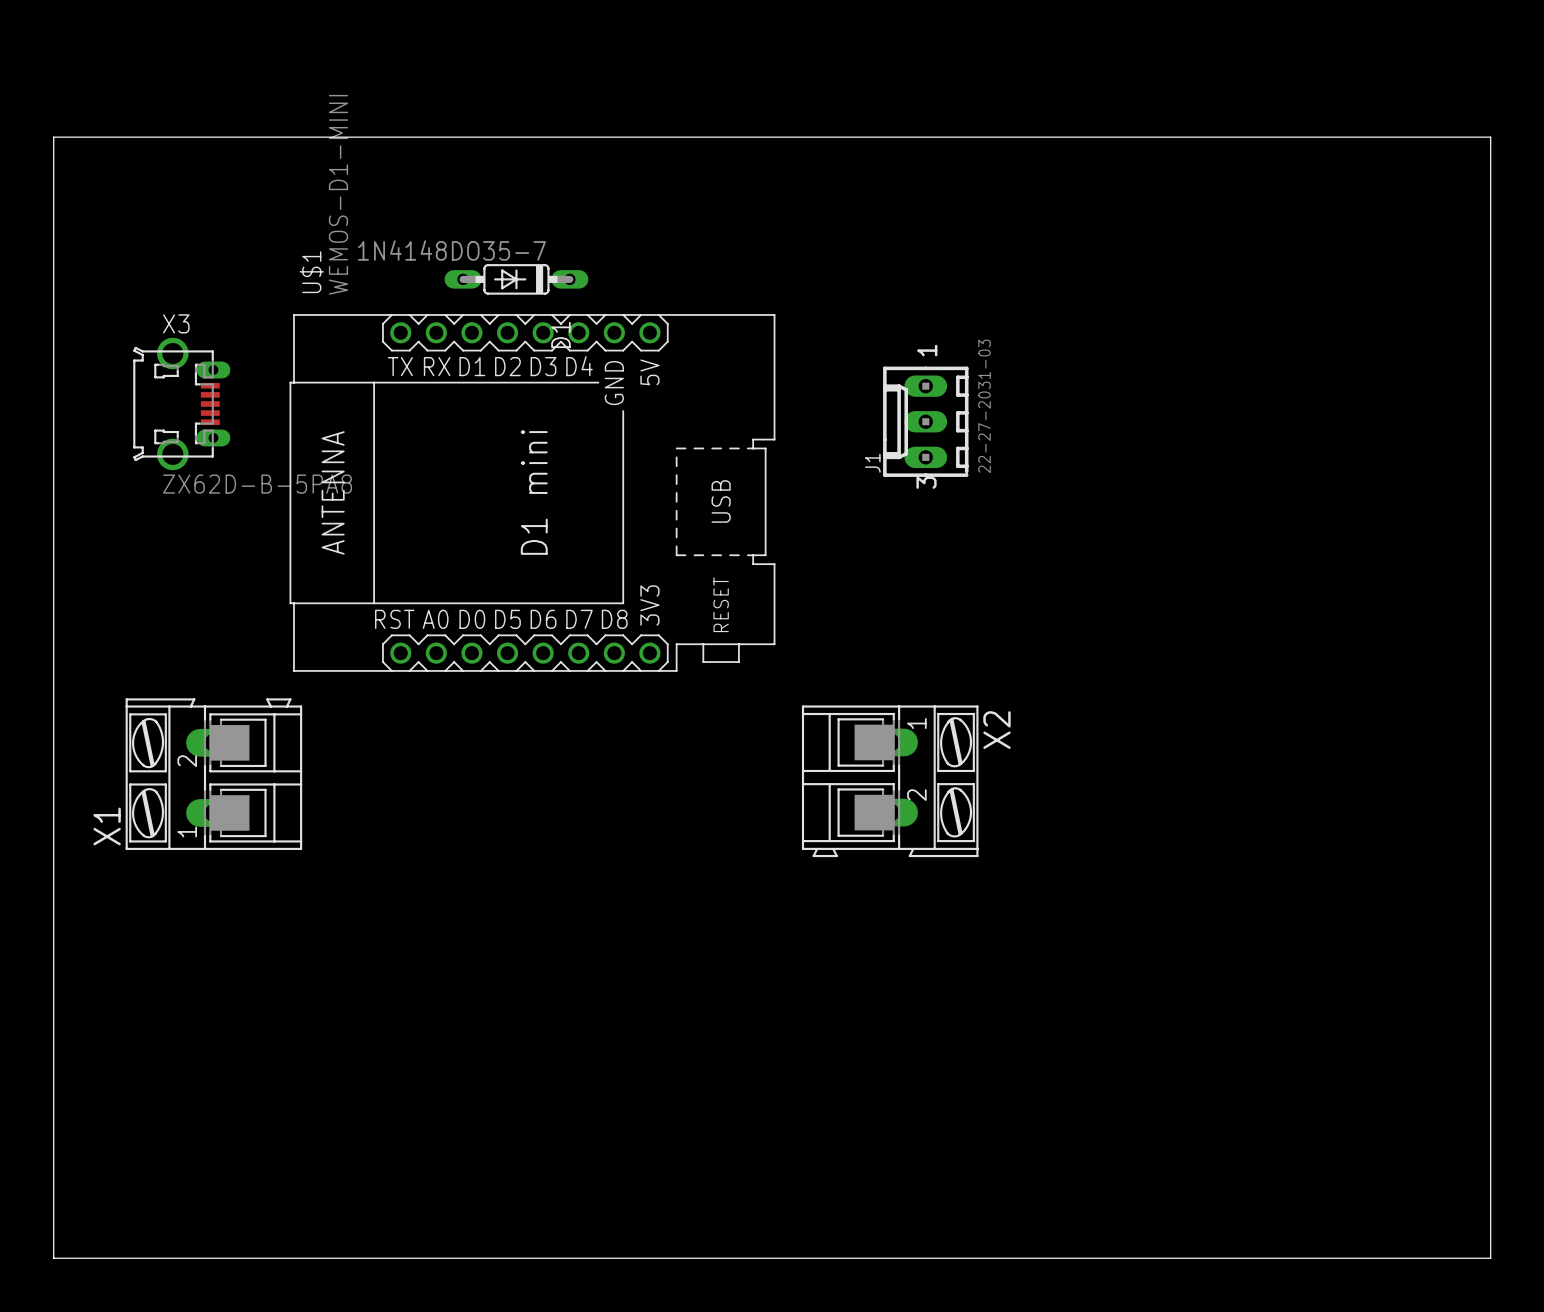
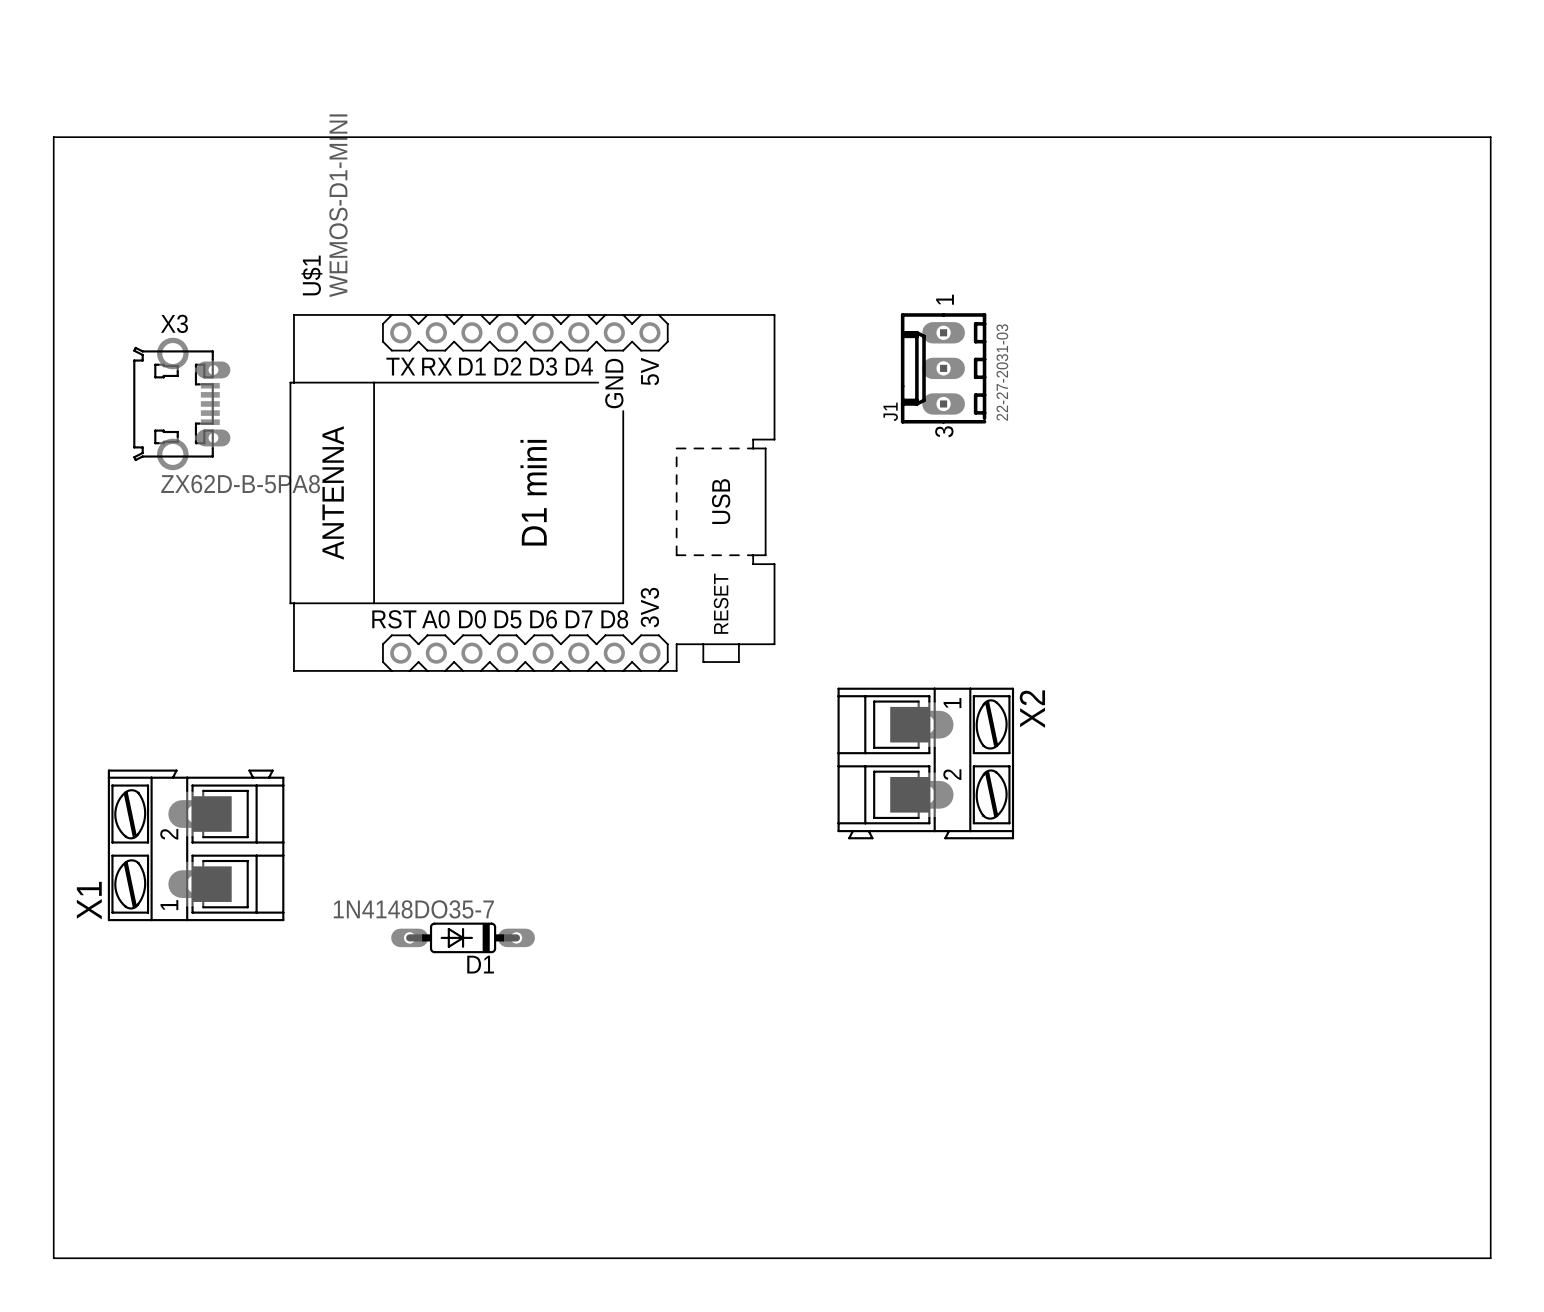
D1 position: (516, 279) -> (463, 937)
D1 name rotation: 0° (560, 334) -> 90° clockwise (480, 964)
D1 name position: D1 (560, 334) -> D1 (480, 964)
J1 position: (925, 421) -> (943, 368)
X1 position: (213, 774) -> (196, 845)
X2 position: (890, 781) -> (925, 763)

